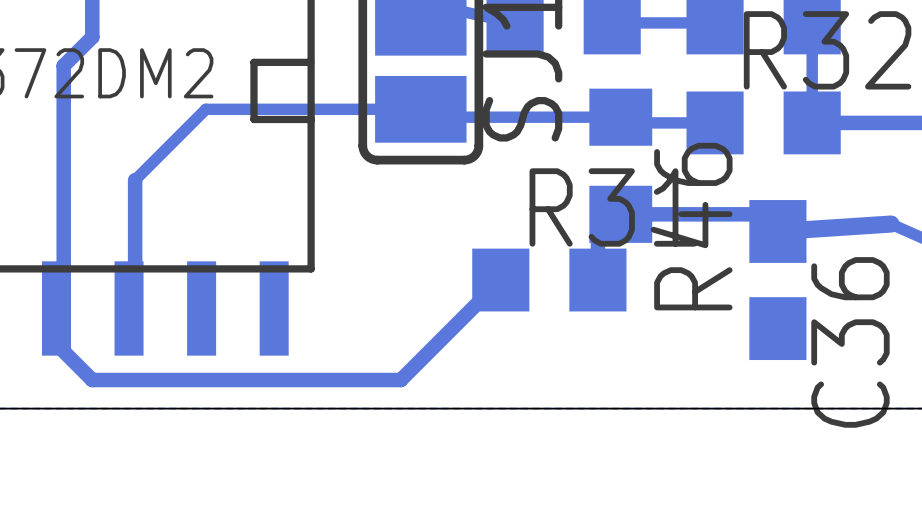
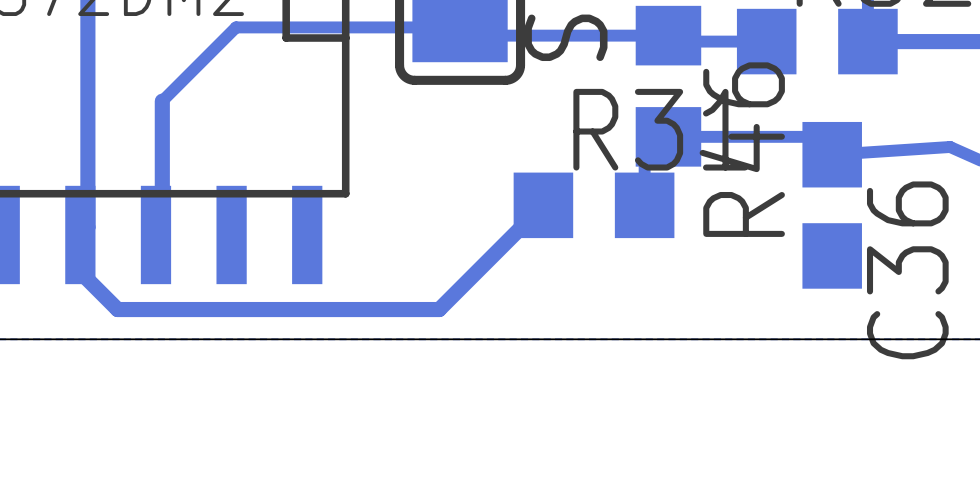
track width: thick (891, 224) (777, 231) (760, 214) (620, 214) (597, 237) (597, 280) -> thin (950, 146) (832, 154) (814, 136) (668, 136) (644, 160) (644, 205)

